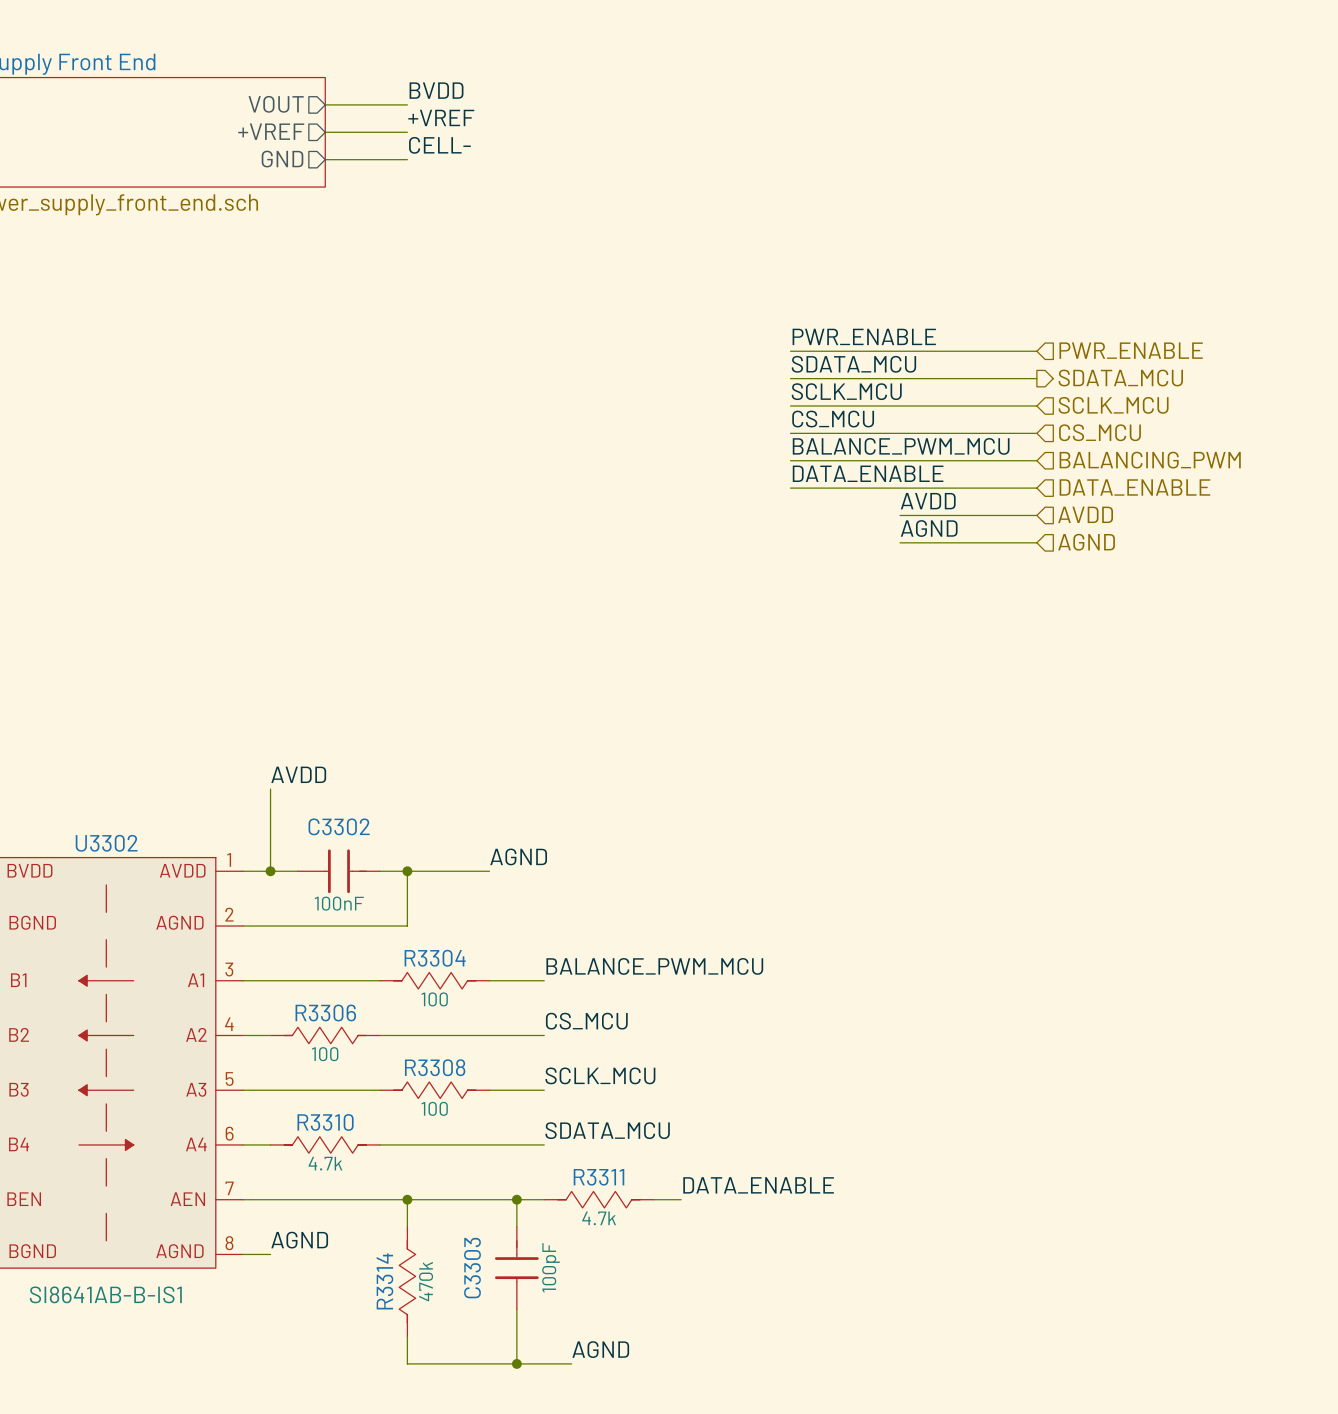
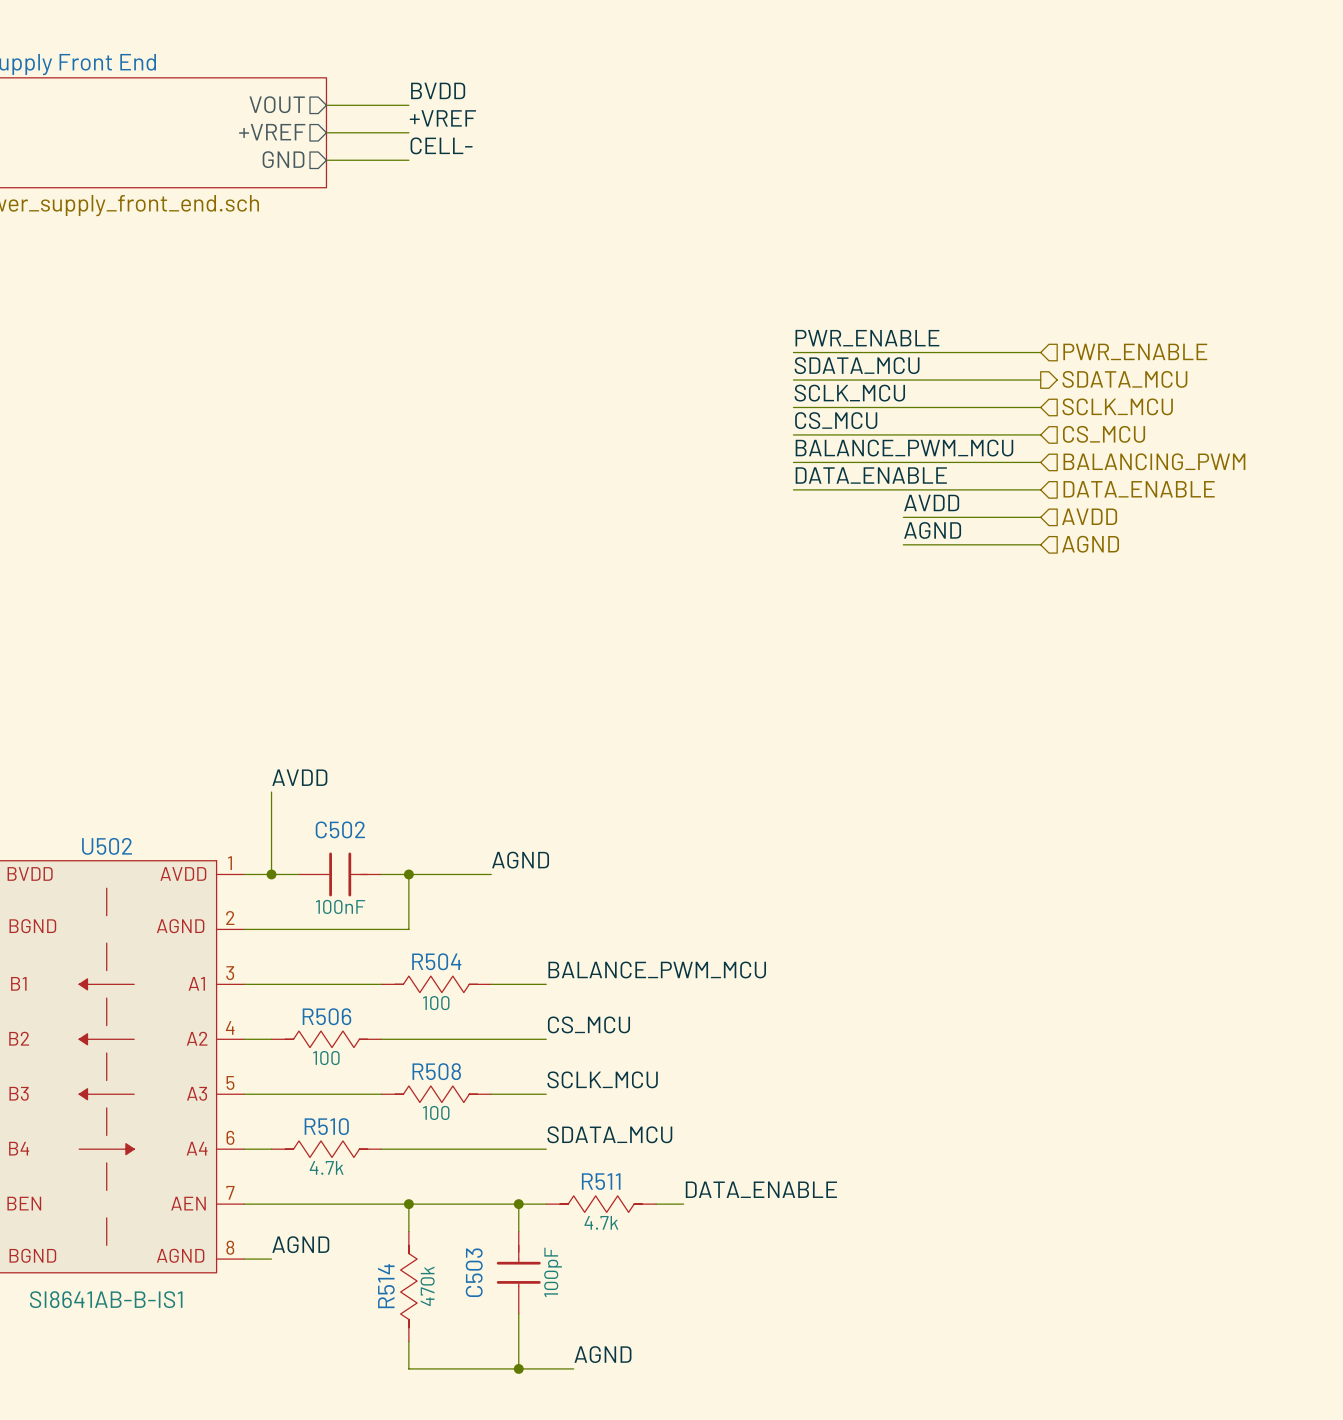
C3302 name: C3302 (339, 826) -> C502 (340, 829)
U3302 name: U3302 (106, 843) -> U502 (107, 846)
R3304 name: R3304 (435, 958) -> R504 (436, 961)
R3306 name: R3306 (325, 1012) -> R506 (326, 1016)
R3308 name: R3308 (435, 1067) -> R508 (436, 1071)
R3310 name: R3310 (325, 1122) -> R510 (326, 1126)
R3311 name: R3311 (598, 1177) -> R511 (601, 1181)
C3303 name: C3303 (472, 1268) -> C503 (474, 1272)
R3314 name: R3314 (384, 1281) -> R514 (386, 1286)

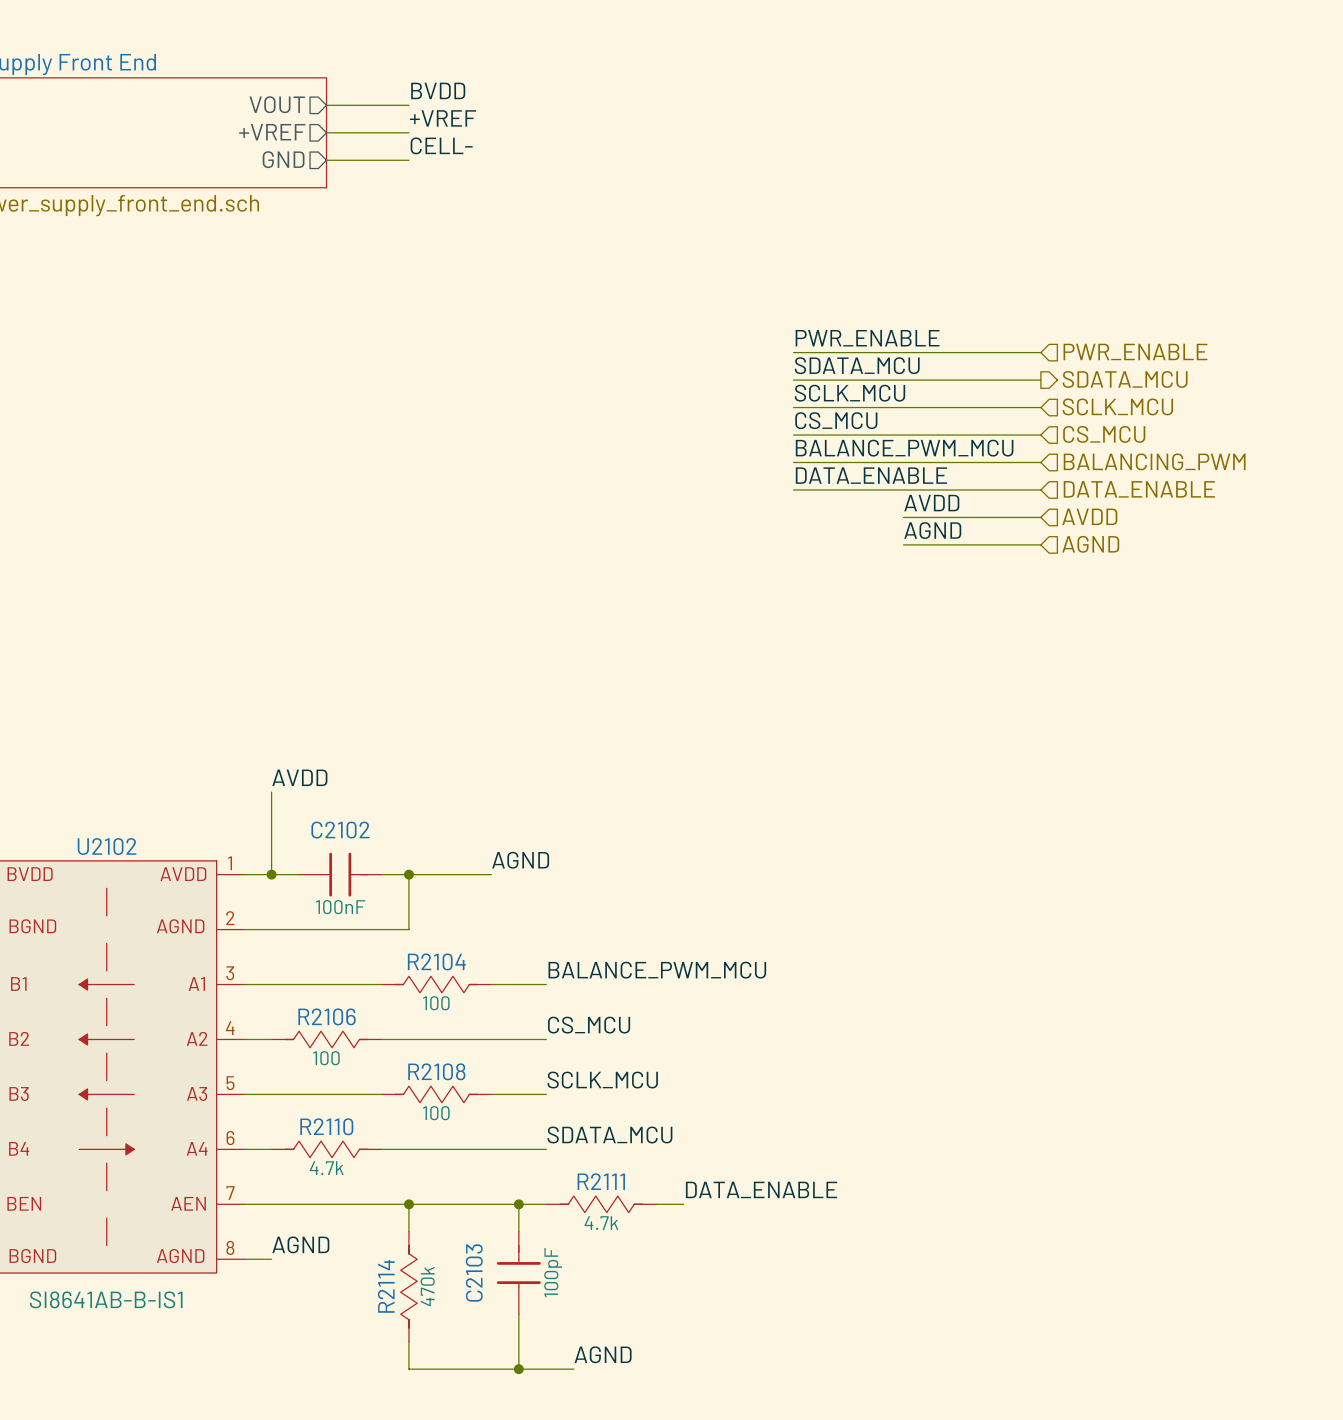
C502 name: C502 (340, 829) -> C2102 (340, 830)
U502 name: U502 (107, 846) -> U2102 (107, 846)
R504 name: R504 (436, 961) -> R2104 (436, 961)
R506 name: R506 (326, 1016) -> R2106 (327, 1016)
R508 name: R508 (436, 1071) -> R2108 (436, 1071)
R510 name: R510 (326, 1126) -> R2110 (326, 1126)
R511 name: R511 (601, 1181) -> R2111 (601, 1181)
C503 name: C503 (474, 1272) -> C2103 (474, 1272)
R514 name: R514 (386, 1286) -> R2114 (386, 1286)

